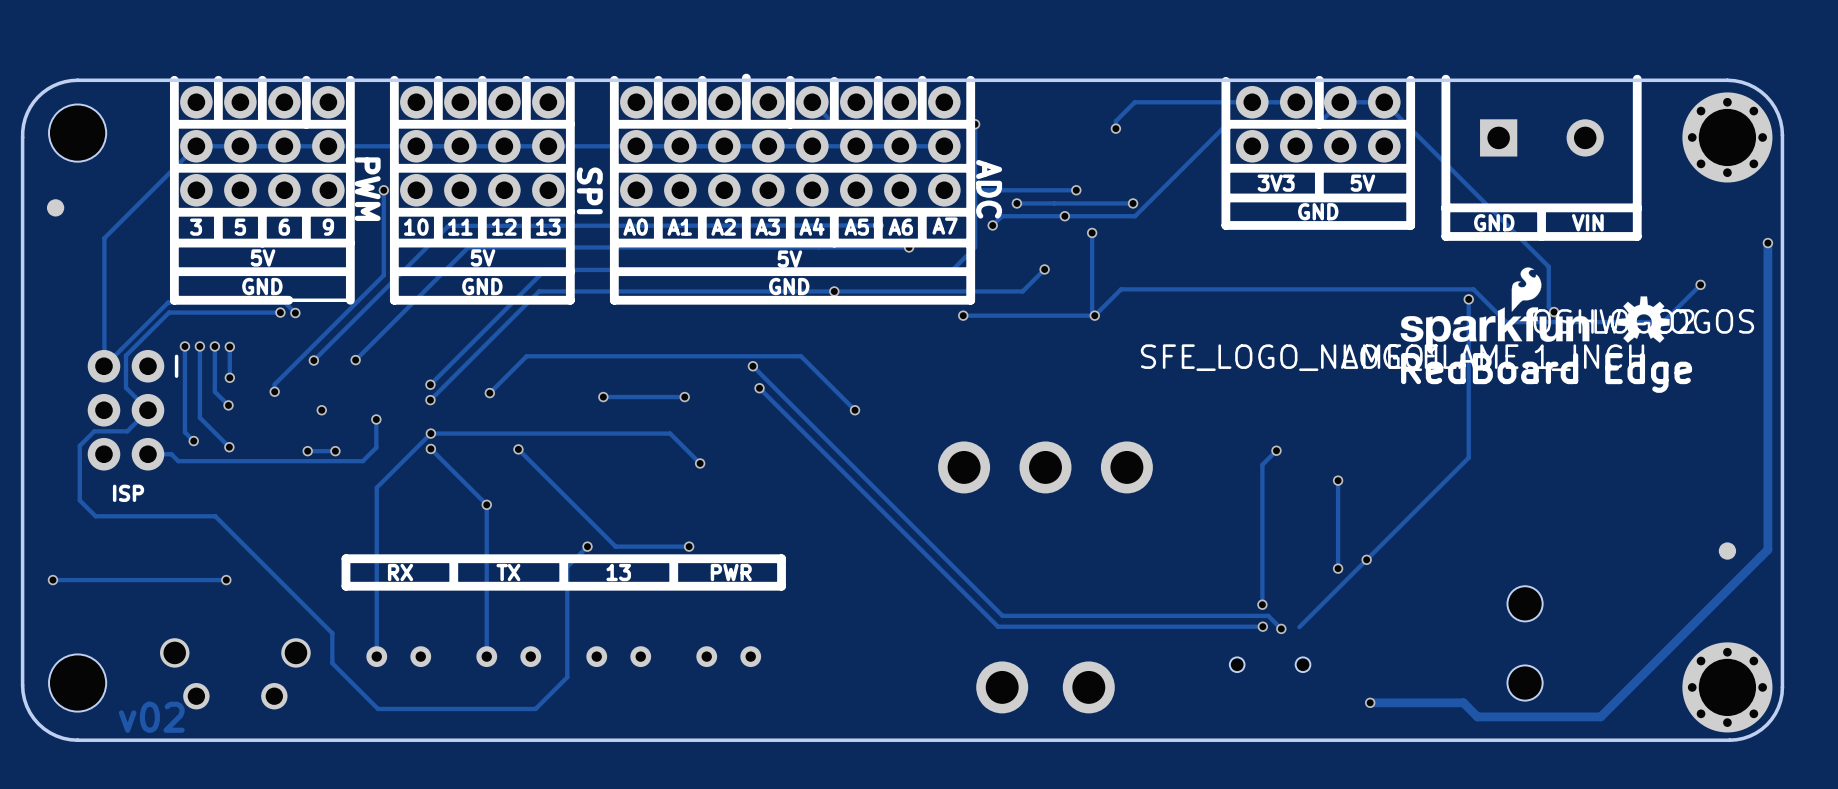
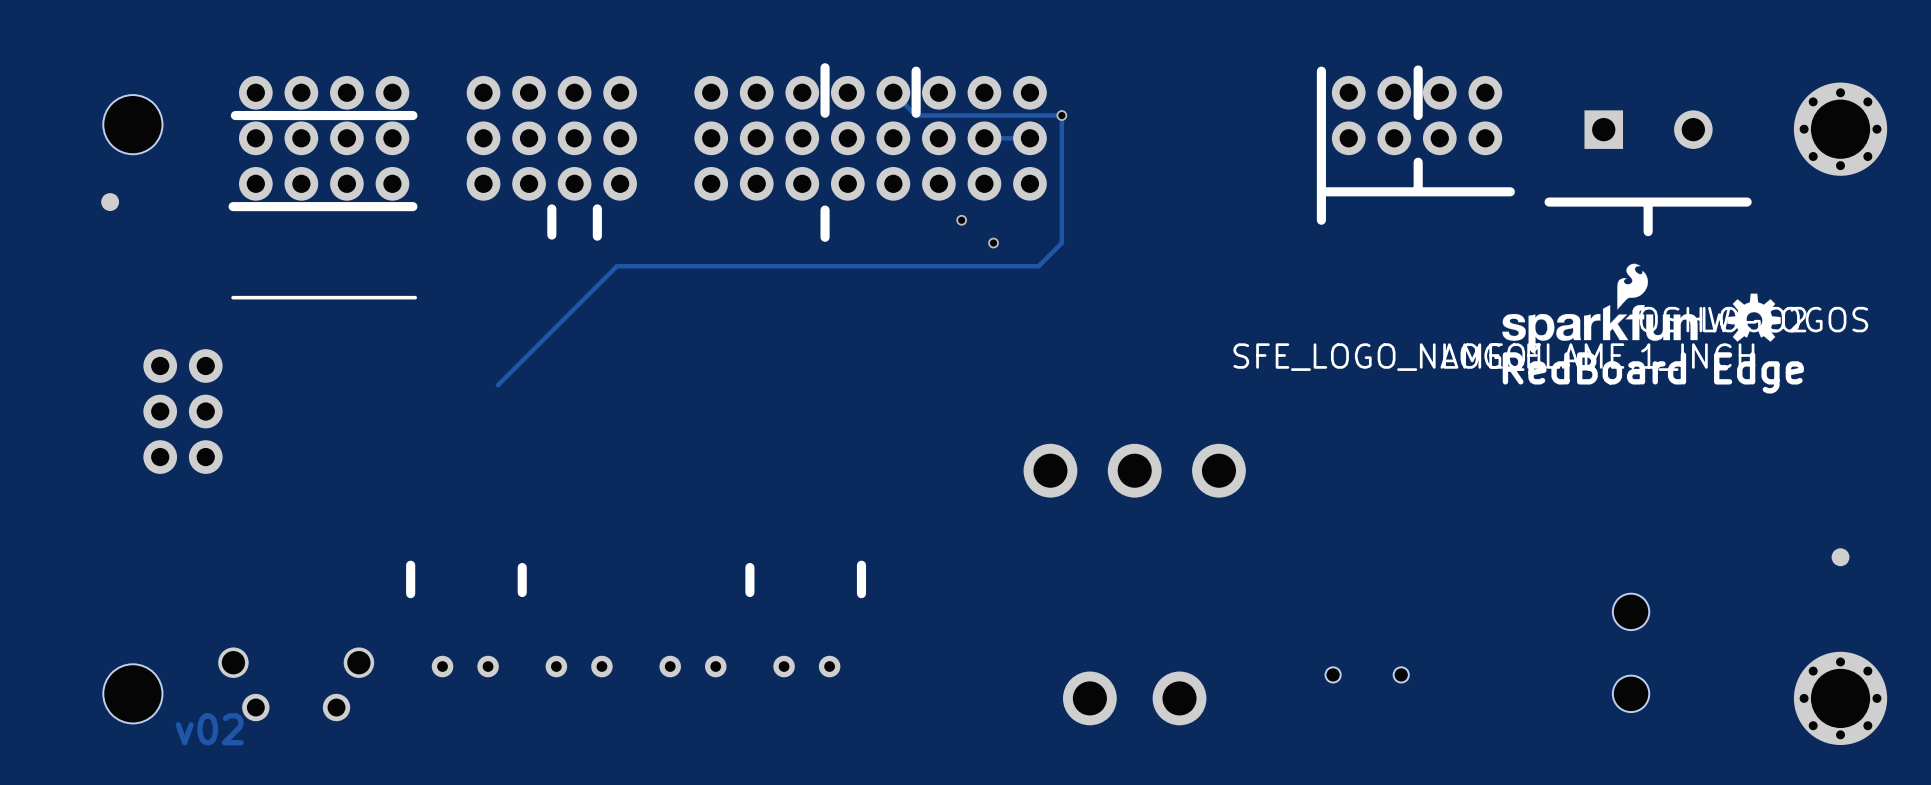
line: (1445, 79) (1445, 236) -> none
line: (1637, 79) (1637, 236) -> none
line: (262, 80) (262, 123) (262, 80) -> none
line: (350, 80) (350, 300) (350, 80) -> none
line: (878, 80) (878, 120) -> none
line: (922, 80) (922, 120) -> none
track: (1296, 102) (1134, 102) (1115, 121) (1115, 128) -> none
line: (482, 122) (482, 80) (482, 124) -> none
line: (526, 122) (526, 80) (526, 124) -> none
line: (702, 122) (702, 80) (702, 124) -> none
line: (218, 123) (218, 80) (218, 124) -> none
line: (306, 123) (306, 80) (306, 124) -> none
line: (438, 123) (438, 80) (438, 124) -> none
line: (658, 123) (658, 80) (658, 124) -> none
line: (790, 123) (790, 80) (790, 124) -> none
line: (396, 124) (570, 124) (394, 124) -> none
line: (970, 124) (615, 124) -> none
line: (1408, 124) (1229, 124) -> none
via: (1115, 128) -> none
board edge: (22, 137) (25, 118) (37, 97) (53, 85) (77, 80) (1727, 80) (1741, 82) (1760, 91) (1771, 101) (1780, 121) (1782, 135) (1782, 687) (1780, 701) (1775, 713) (1761, 729) (1749, 736) (1729, 740) (77, 740) (63, 738) (44, 728) (33, 718) (26, 706) (23, 692) (22, 137) -> none
track: (895, 146) (196, 146) (104, 238) (104, 366) (168, 302) (284, 302) (295, 313) -> none
line: (348, 168) (177, 168) -> none
line: (568, 168) (395, 168) -> none
line: (970, 168) (616, 168) -> none
line: (1407, 168) (1228, 168) -> none
text: 3V3 (1276, 183) -> none
text: 5V (1362, 183) -> none
text: PWM (367, 189) -> none
text: ADC (989, 189) -> none
track: (383, 190) (383, 275) (274, 384) (274, 391) -> none
via: (383, 190) -> none
text: SPI (589, 190) -> none
track: (1076, 190) (975, 190) -> none
via: (1076, 190) -> none
via: (1016, 203) -> none
track: (1133, 203) (1016, 203) -> none
via: (1133, 203) -> none
text: GND (1318, 211) -> none
line: (262, 212) (262, 243) (262, 212) -> none
line: (396, 212) (570, 212) (394, 212) -> none
line: (616, 212) (970, 212) (614, 212) -> none
line: (834, 212) (834, 243) (834, 215) -> none
line: (218, 213) (218, 240) (218, 213) -> none
line: (438, 213) (438, 241) (438, 214) -> none
line: (658, 213) (658, 241) (658, 213) -> none
line: (878, 214) (878, 241) -> none
line: (922, 214) (922, 241) -> none
via: (1064, 216) -> none
text: GND (1494, 222) -> none
text: VIN (1587, 222) -> none
track: (878, 225) (448, 225) (313, 360) -> none
track: (992, 225) (1001, 216) (1135, 216) (1227, 123) (1319, 123) (1340, 102) (1384, 102) (1548, 266) (1548, 306) (1554, 312) -> none
via: (992, 225) -> none
line: (1410, 225) (1225, 225) -> none
line: (1410, 225) (1410, 80) (1410, 225) -> none
text: A4 (811, 226) -> none
text: A7 (945, 226) -> none
text: 3 (196, 227) -> none
text: 5 (240, 227) -> none
text: 6 (284, 227) -> none
text: 9 (328, 227) -> none
text: 10 (416, 227) -> none
text: 11 (460, 227) -> none
text: 12 (504, 227) -> none
text: 13 (548, 227) -> none
text: A0 (635, 227) -> none
text: A1 (679, 227) -> none
text: A2 (723, 227) -> none
text: A3 (767, 227) -> none
text: A5 (856, 227) -> none
text: A6 (900, 227) -> none
track: (1092, 232) (1092, 313) (1094, 315) -> none
via: (1092, 232) -> none
line: (1637, 236) (1445, 236) -> none
line: (306, 240) (306, 213) (306, 243) -> none
line: (702, 240) (702, 213) (702, 241) -> none
line: (790, 240) (790, 213) (790, 243) -> none
line: (176, 243) (350, 243) (174, 243) -> none
line: (570, 243) (395, 243) (568, 243) -> none
line: (970, 243) (615, 243) -> none
track: (1767, 243) (1767, 549) (1600, 716) (1477, 716) (1463, 702) (1370, 702) -> none
via: (1767, 243) -> none
track: (909, 247) (468, 247) (355, 360) -> none
text: 5V (263, 257) -> none
text: 5V (483, 257) -> none
text: 5V (789, 259) -> none
track: (1044, 269) (1022, 291) (539, 291) (430, 400) -> none
via: (1044, 269) -> none
line: (176, 271) (349, 271) (174, 271) -> none
line: (570, 271) (395, 271) (569, 271) -> none
line: (970, 271) (616, 271) -> none
track: (1700, 284) (1663, 322) (1506, 322) (1473, 289) (1121, 289) (1094, 315) -> none
via: (1700, 284) -> none
text: GND (262, 286) -> none
text: GND (482, 286) -> none
text: GND (789, 286) -> none
via: (834, 291) -> none
track: (1468, 299) (1468, 457) (1299, 627) -> none
via: (1468, 299) -> none
line: (174, 300) (174, 80) (174, 300) -> none
line: (394, 300) (394, 80) (394, 300) -> none
line: (570, 300) (394, 300) -> none
line: (570, 300) (570, 80) (570, 300) -> none
line: (614, 300) (614, 80) (614, 300) -> none
line: (970, 300) (970, 80) (970, 300) -> none
line: (970, 300) (614, 300) -> none
track: (280, 312) (169, 312) (125, 355) (125, 387) (148, 410) (127, 431) (94, 431) (79, 445) (79, 500) (95, 516) (215, 516) (332, 633) (332, 663) (378, 708) (535, 708) (567, 677) (567, 566) (587, 546) -> none
via: (280, 312) -> none
via: (1554, 312) -> none
via: (295, 313) -> none
via: (963, 315) -> none
track: (1094, 315) (963, 315) -> none
via: (1094, 315) -> none
track: (184, 346) (184, 432) (193, 441) -> none
via: (184, 346) -> none
track: (199, 346) (199, 417) (229, 447) -> none
via: (199, 346) -> none
track: (214, 346) (214, 391) (228, 405) -> none
via: (214, 346) -> none
track: (229, 346) (229, 377) -> none
via: (229, 346) -> none
line: (176, 356) (176, 376) -> none
via: (313, 360) -> none
via: (355, 360) -> none
track: (752, 366) (1002, 615) (1268, 615) (1281, 628) -> none
via: (752, 366) -> none
via: (229, 377) -> none
via: (430, 384) -> none
track: (759, 388) (997, 626) (1262, 626) -> none
via: (759, 388) -> none
via: (274, 391) -> none
track: (489, 393) (526, 356) (801, 356) (855, 410) -> none
via: (489, 393) -> none
via: (603, 397) -> none
track: (684, 397) (603, 397) -> none
via: (684, 397) -> none
via: (430, 400) -> none
via: (228, 405) -> none
via: (321, 410) -> none
via: (855, 410) -> none
track: (376, 419) (376, 447) (362, 461) (178, 461) (171, 454) (148, 454) -> none
via: (376, 419) -> none
via: (430, 433) -> none
via: (193, 441) -> none
via: (229, 447) -> none
track: (430, 448) (486, 504) (486, 656) -> none
via: (430, 448) -> none
track: (518, 449) (615, 546) (689, 546) -> none
via: (518, 449) -> none
track: (1276, 450) (1262, 464) (1262, 604) -> none
via: (1276, 450) -> none
via: (307, 451) -> none
track: (335, 451) (307, 451) -> none
via: (335, 451) -> none
track: (700, 463) (670, 433) (430, 433) (376, 487) (376, 656) -> none
via: (700, 463) -> none
track: (1338, 480) (1338, 568) -> none
via: (1338, 480) -> none
text: ISP (128, 493) -> none
via: (486, 504) -> none
via: (587, 546) -> none
via: (689, 546) -> none
line: (345, 558) (781, 558) (345, 558) -> none
line: (563, 559) (563, 585) (563, 559) -> none
via: (1366, 559) -> none
via: (1338, 568) -> none
text: RX (400, 572) -> none
text: TX (508, 572) -> none
text: 13 (618, 572) -> none
text: PWR (731, 572) -> none
via: (52, 580) -> none
track: (226, 580) (52, 580) -> none
via: (226, 580) -> none
line: (781, 586) (345, 586) -> none
via: (1262, 604) -> none
via: (1262, 626) -> none
via: (1281, 628) -> none
via: (1370, 702) -> none

